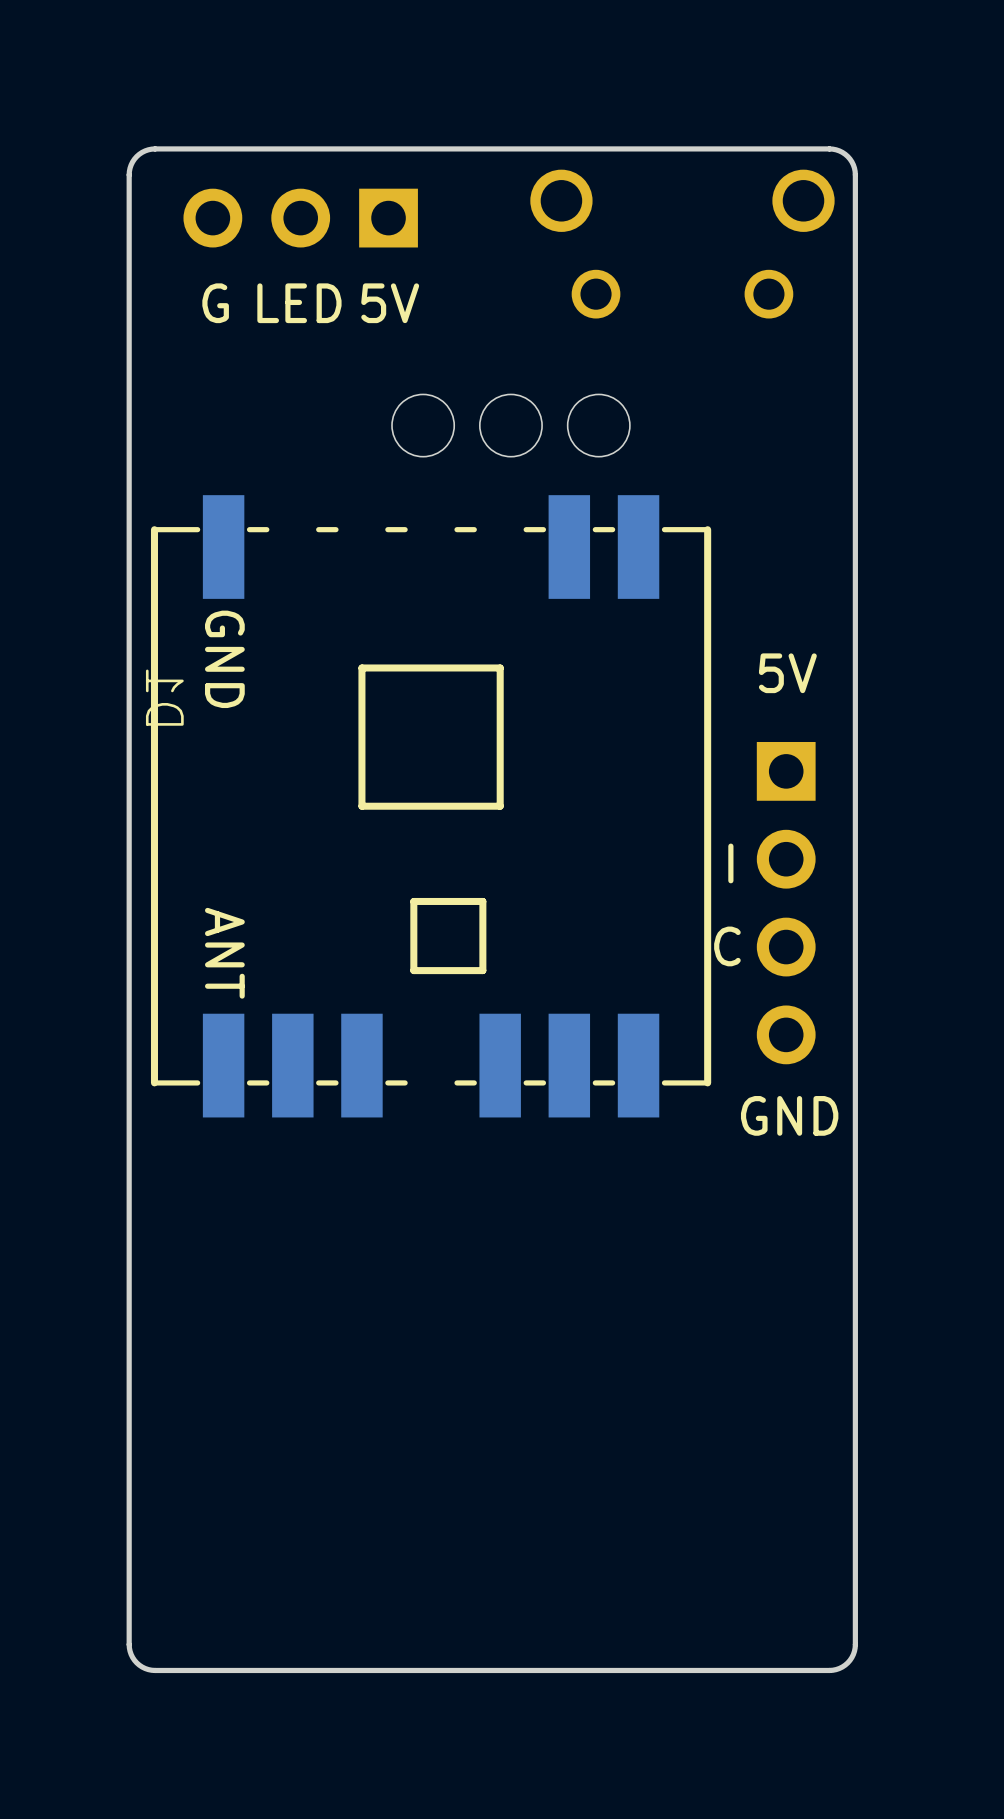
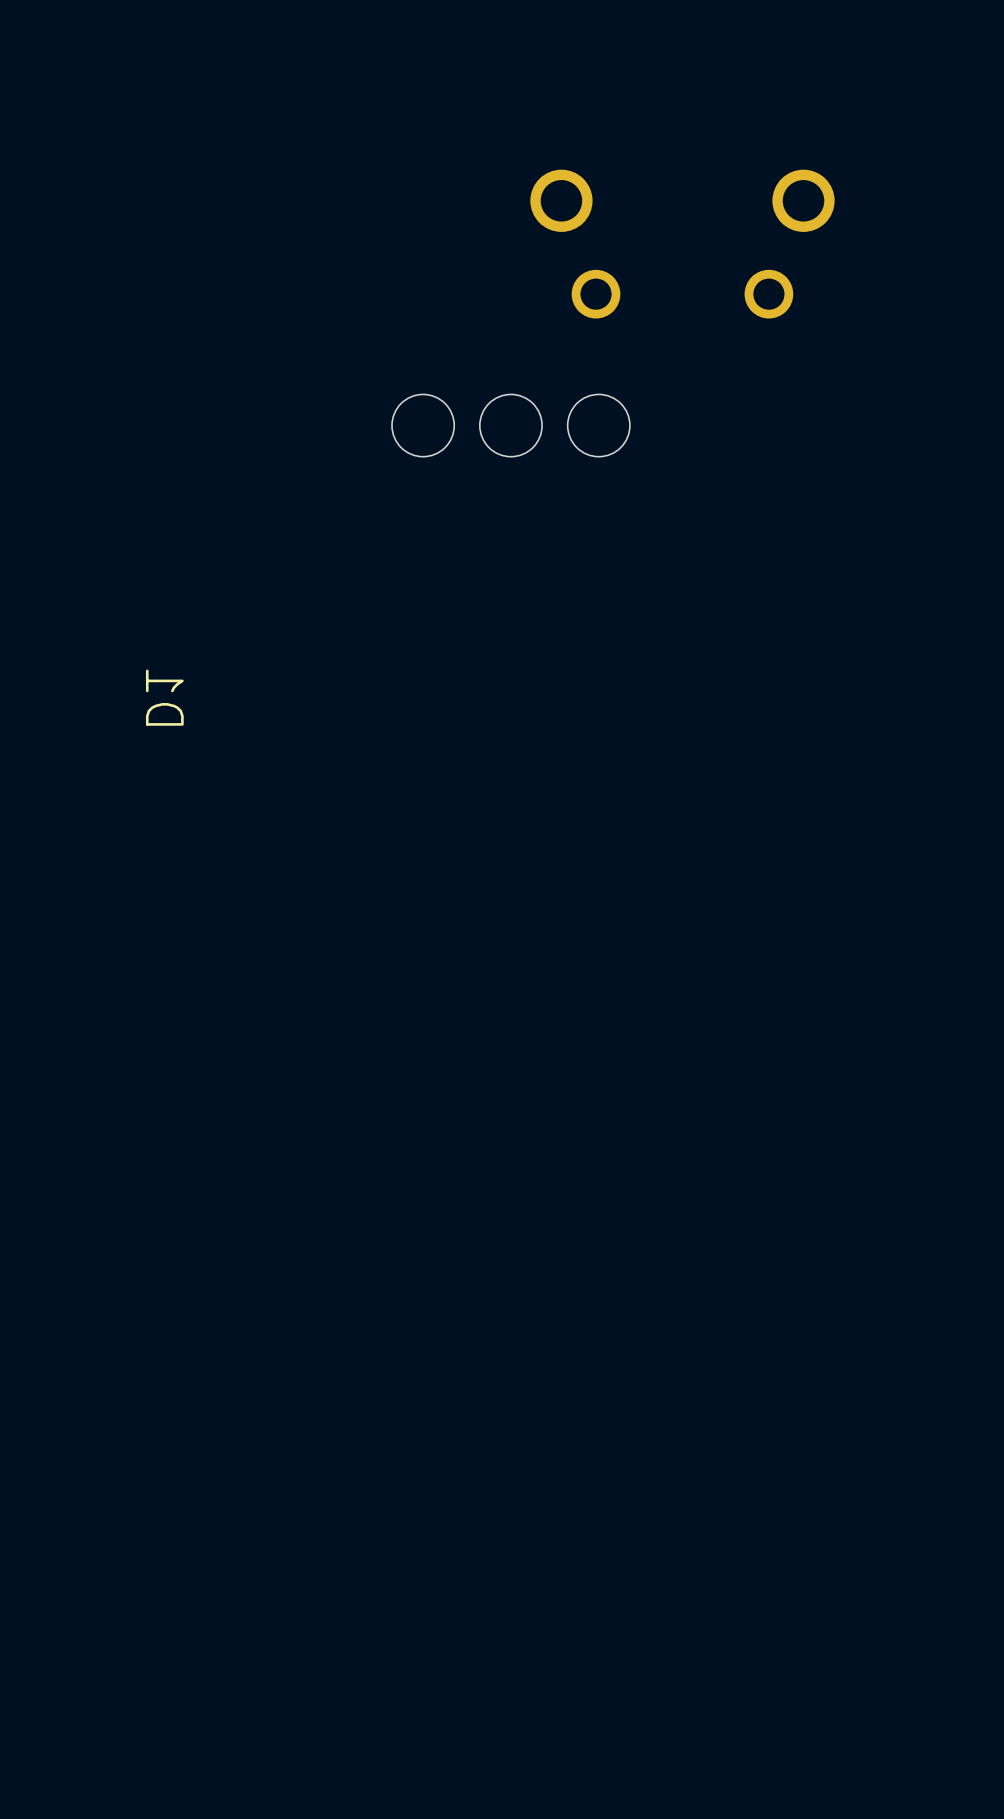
board edge: (829, 148) (155, 148) (139, 154) (131, 164) (129, 174) (129, 1644) (132, 1657) (145, 1668) (155, 1670) (829, 1670) (845, 1665) (853, 1654) (855, 1644) (855, 174) (853, 164) (847, 156) (839, 150) (829, 148) -> none
part: (300, 218) -> none
text: G (215, 303) -> none
text: LED (299, 303) -> none
text: 5V (390, 303) -> none
text: 5V (787, 673) -> none
part: (431, 806) -> none
text: I (730, 863) -> none
part: (786, 903) -> none
text: C (727, 946) -> none
text: GND (789, 1115) -> none

